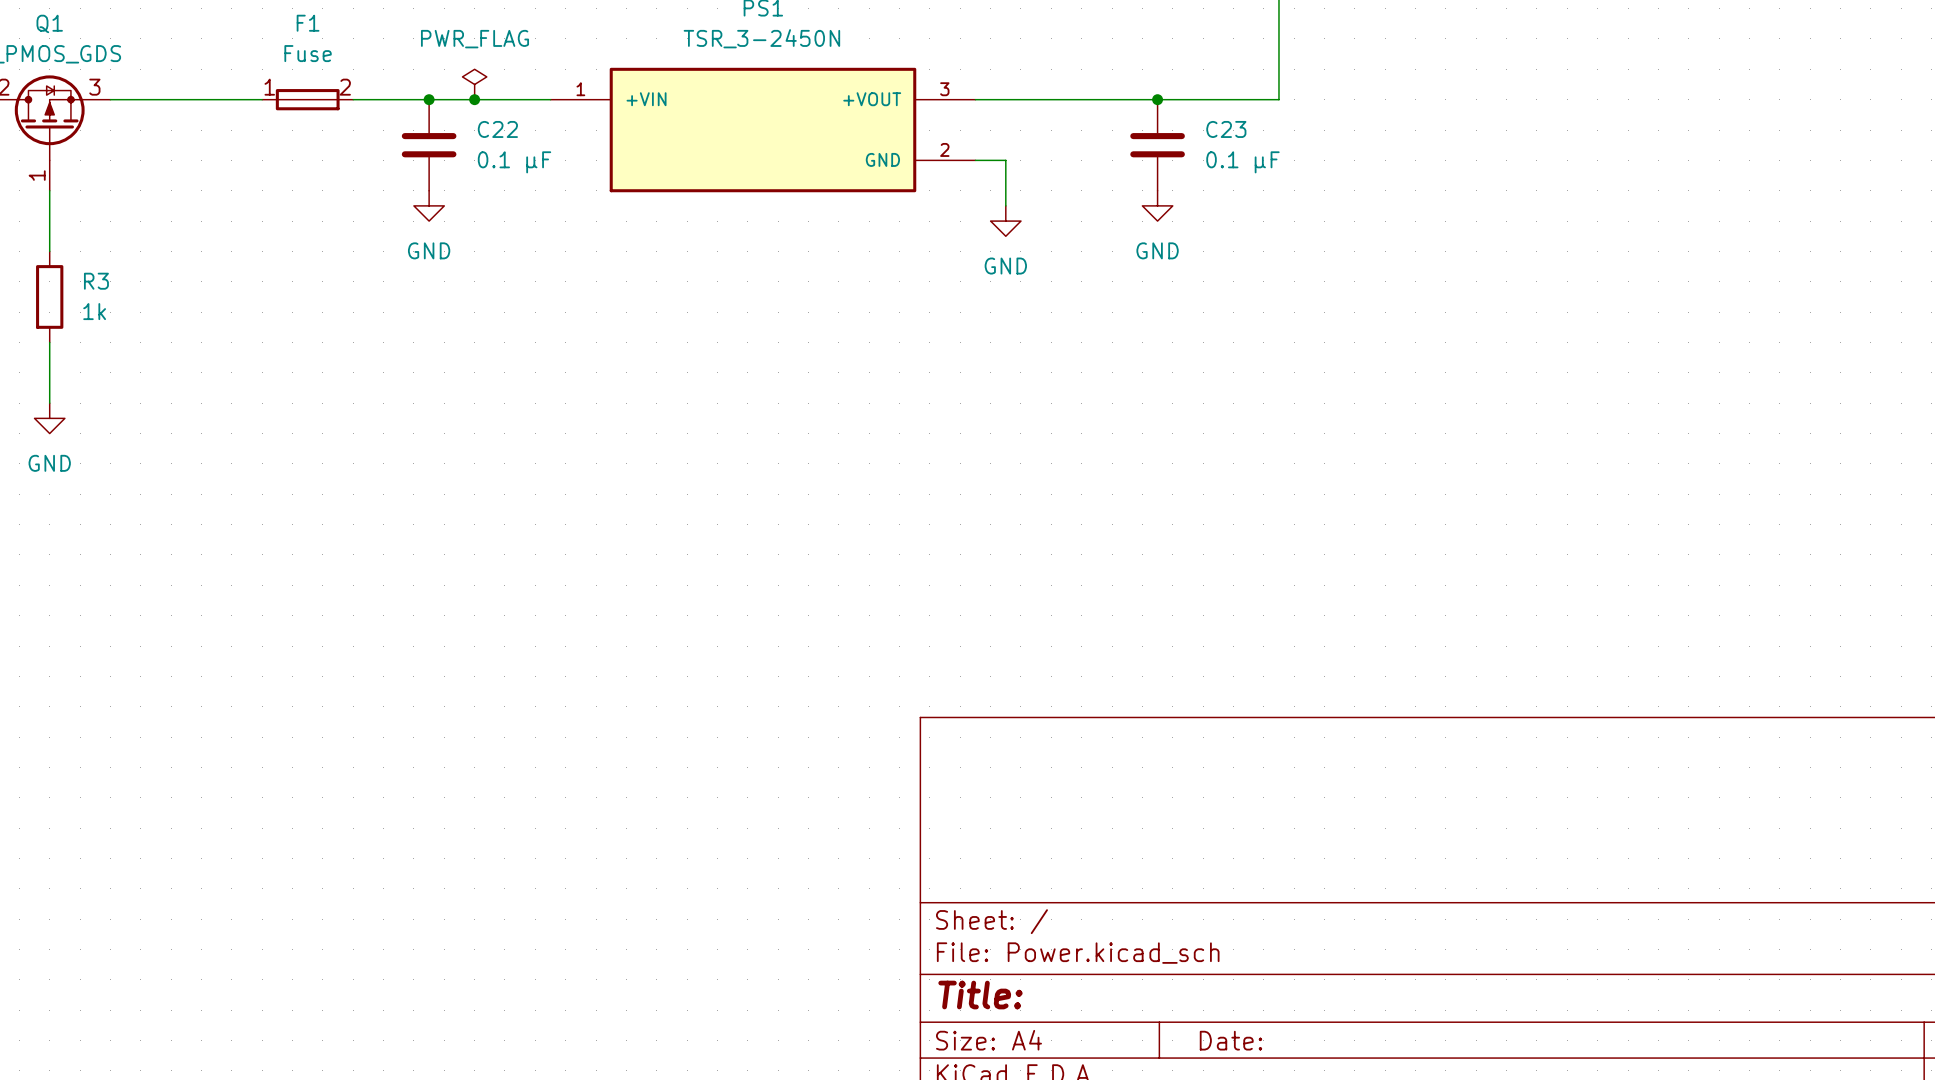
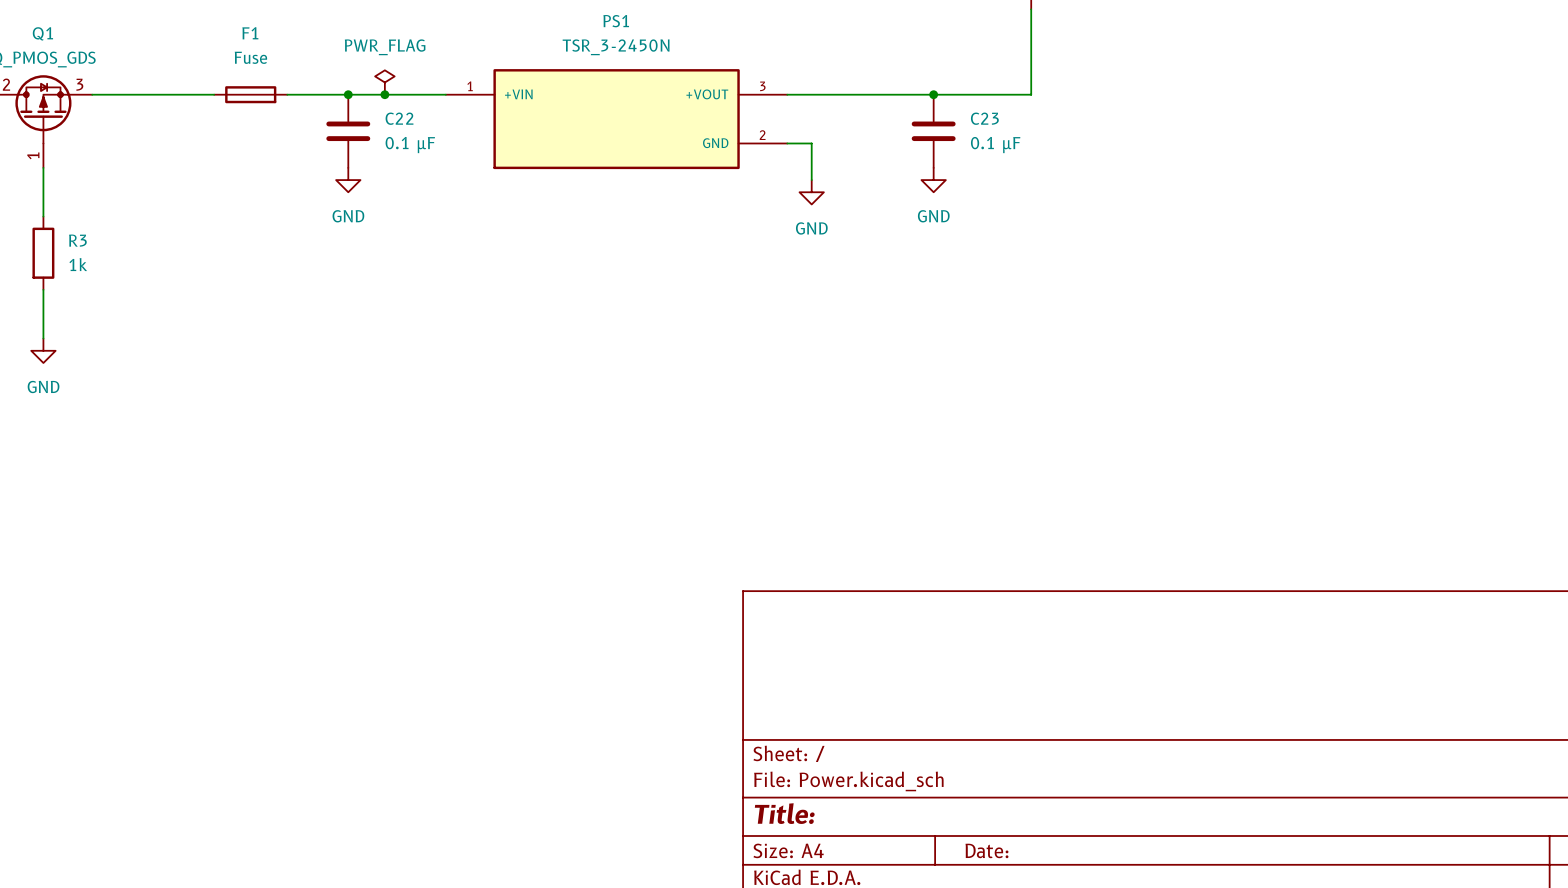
F1 pin number: 1 (269, 87) -> none
F1 pin number: 2 (345, 87) -> none

